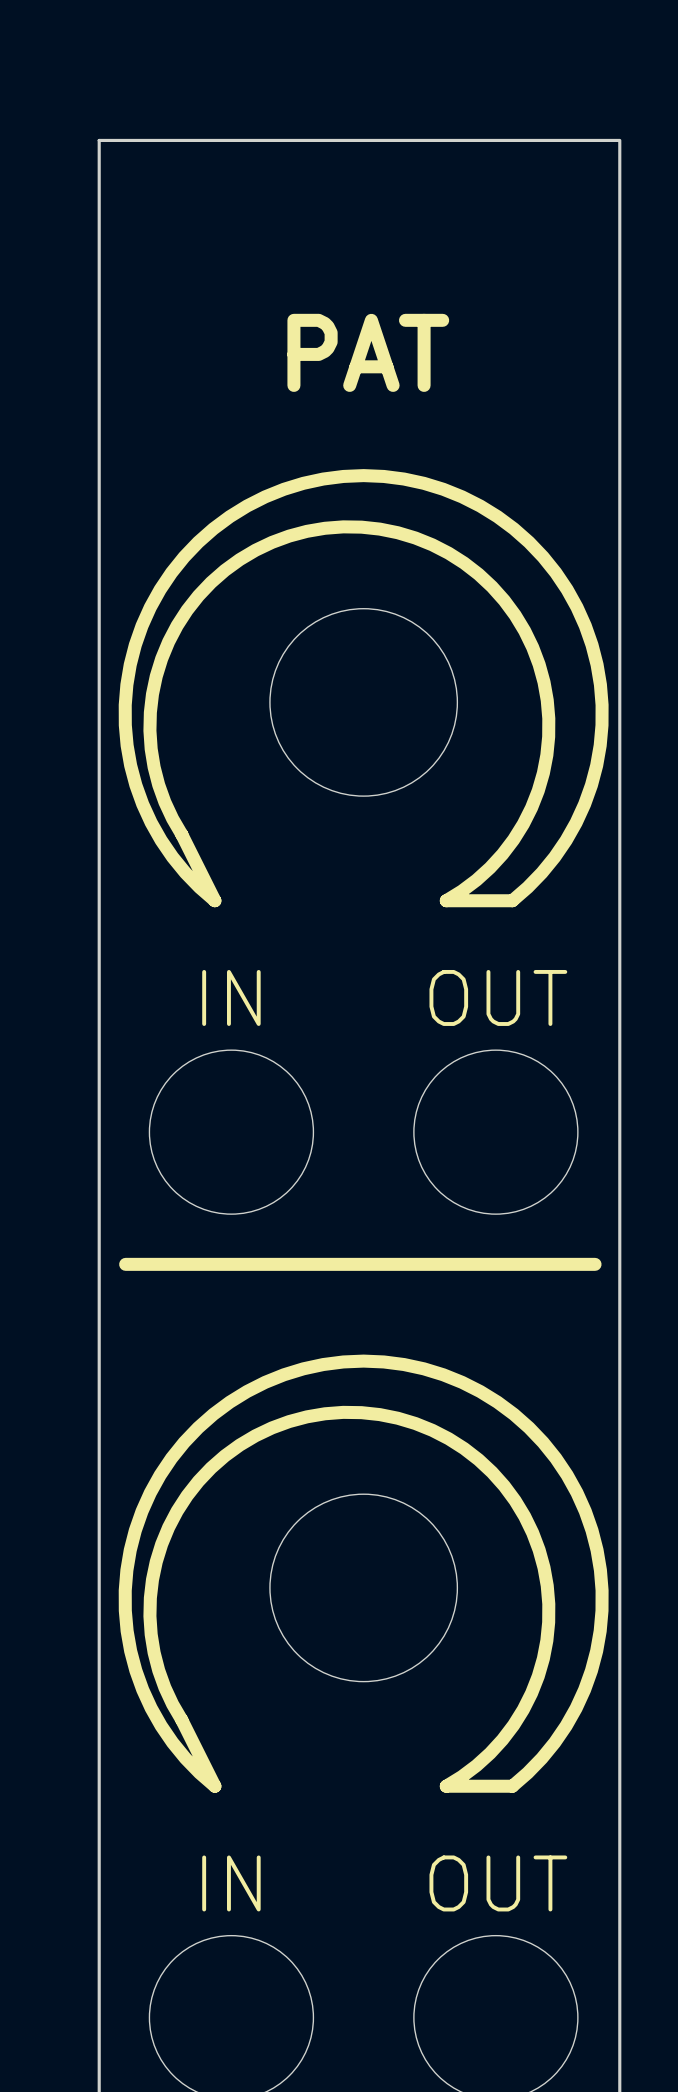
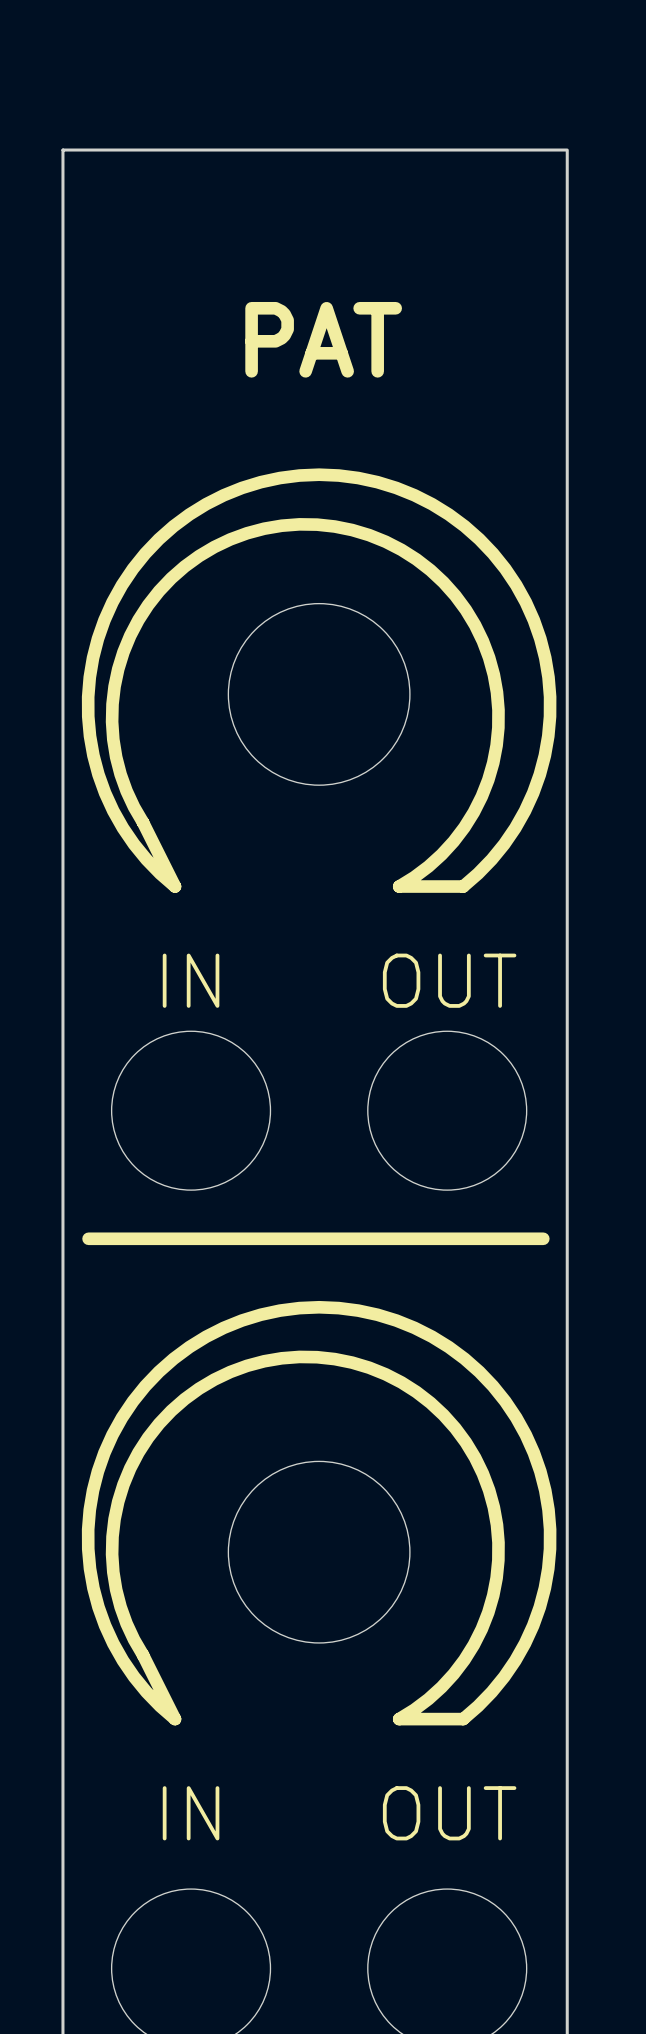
text position: PAT (368, 352) -> PAT (323, 339)
line: (181, 1720) (214, 1786) (199, 1772) (172, 1742) (161, 1725) (142, 1689) (130, 1650) (127, 1630) (125, 1610) (126, 1570) (130, 1550) (142, 1511) (160, 1475) (171, 1458) (198, 1427) (229, 1402) (265, 1382) (303, 1368) (323, 1364) (363, 1361) (404, 1364) (443, 1374) (462, 1382) (497, 1402) (513, 1414) (543, 1442) (567, 1475) (585, 1511) (597, 1550) (602, 1590) (602, 1610) (596, 1650) (584, 1689) (566, 1725) (541, 1758) (512, 1786) (446, 1786) (476, 1765) (502, 1739) (523, 1709) (538, 1676) (546, 1640) (548, 1622) (547, 1585) (539, 1550) (532, 1532) (515, 1500) (492, 1472) (478, 1459) (448, 1438) (432, 1430) (415, 1423) (379, 1414) (343, 1412) (325, 1413) (289, 1421) (272, 1427) (255, 1435) (224, 1455) (211, 1468) (187, 1495) (168, 1527) (161, 1544) (156, 1561) (150, 1597) (151, 1634) (158, 1670) (164, 1687) (181, 1720) -> (143, 1655) (175, 1719) (146, 1692) (134, 1676) (122, 1660) (105, 1625) (98, 1607) (90, 1568) (88, 1549) (89, 1509) (97, 1471) (104, 1452) (122, 1417) (145, 1386) (173, 1358) (189, 1347) (223, 1327) (241, 1320) (279, 1310) (319, 1307) (358, 1310) (396, 1320) (414, 1327) (448, 1347) (464, 1358) (492, 1386) (516, 1417) (533, 1452) (545, 1490) (550, 1529) (548, 1568) (539, 1607) (533, 1625) (515, 1660) (491, 1692) (463, 1719) (399, 1719) (414, 1709) (441, 1687) (464, 1659) (481, 1629) (493, 1595) (498, 1560) (496, 1524) (489, 1490) (482, 1473) (465, 1442) (455, 1428) (430, 1402) (401, 1382) (385, 1374) (369, 1367) (334, 1359) (299, 1356) (281, 1358) (247, 1365) (214, 1379) (199, 1388) (171, 1410) (148, 1437) (138, 1452) (130, 1468) (118, 1501) (114, 1519) (112, 1554) (113, 1572) (120, 1606) (134, 1639) (143, 1655)
text position: IN (231, 1883) -> IN (191, 1813)
text position: OUT (498, 1883) -> OUT (449, 1813)

